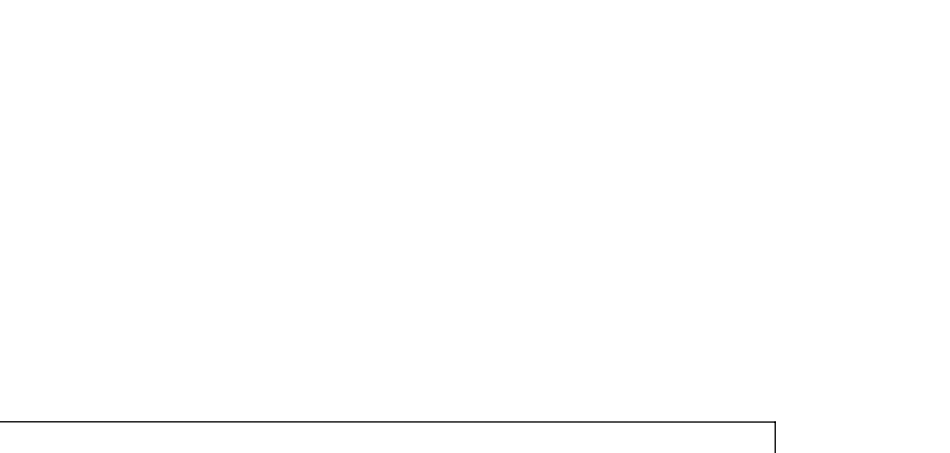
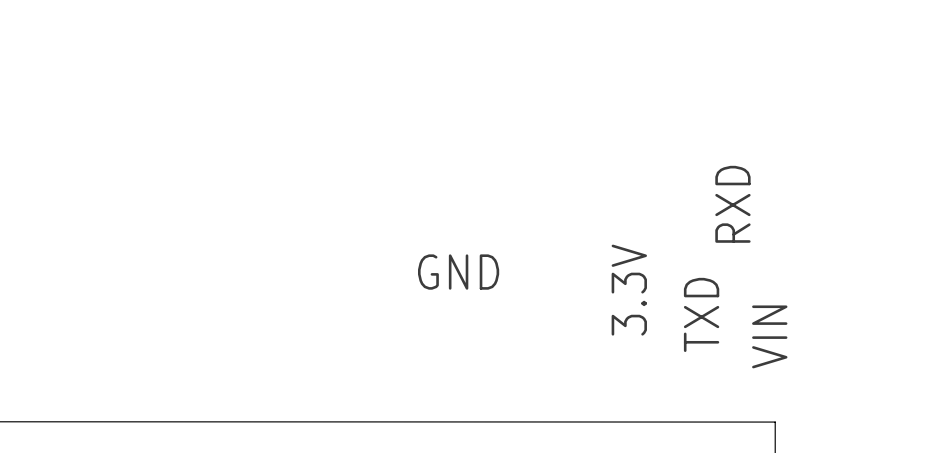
text: none -> RXD (732, 204)
text: none -> GND (458, 272)
text: none -> 3.3V (629, 290)
text: none -> TXD (701, 314)
text: none -> VIN (769, 336)

